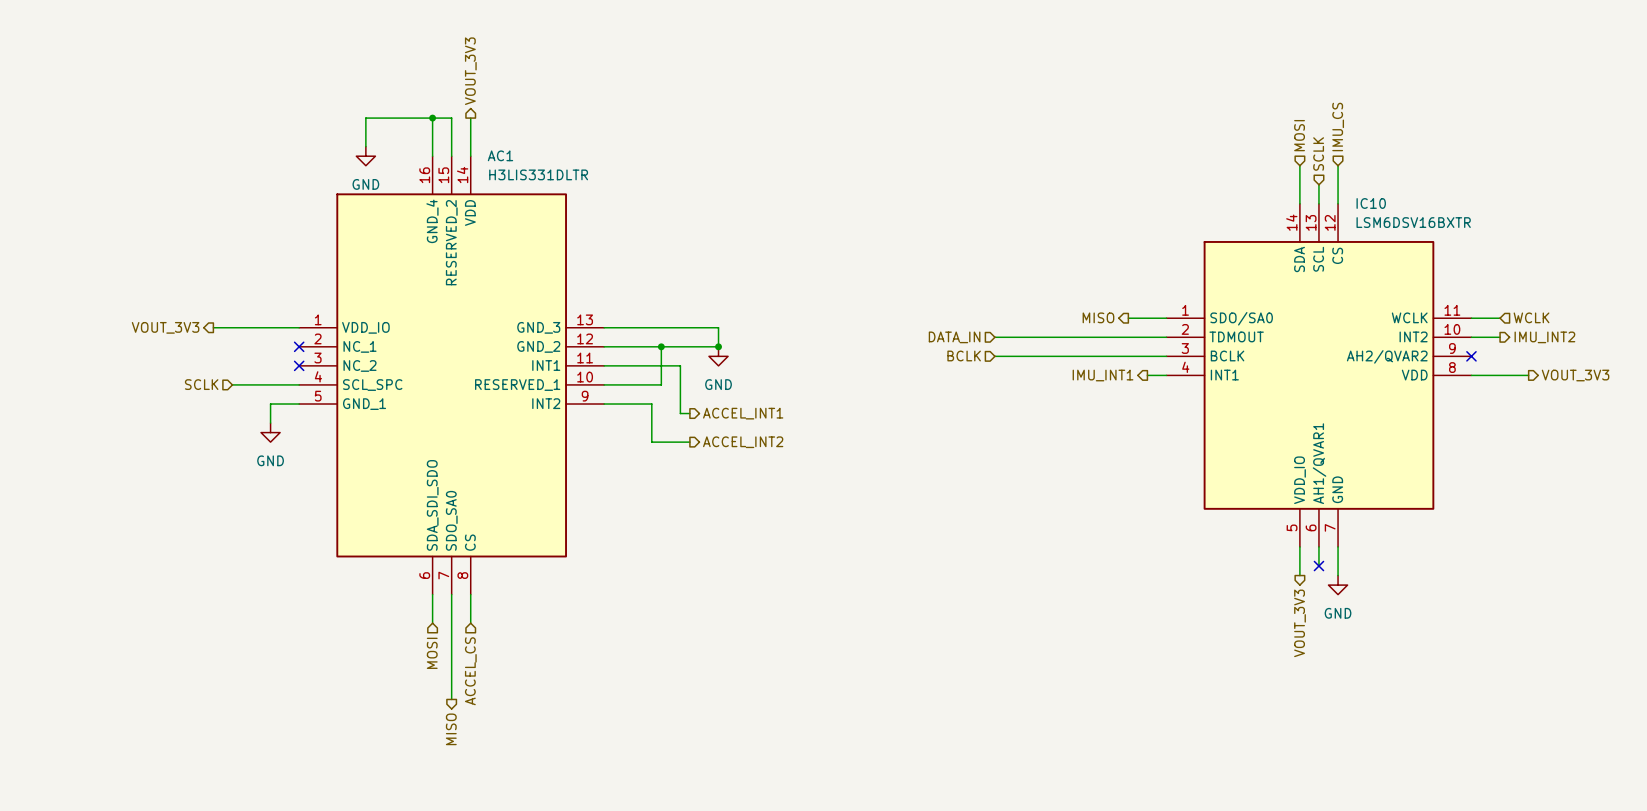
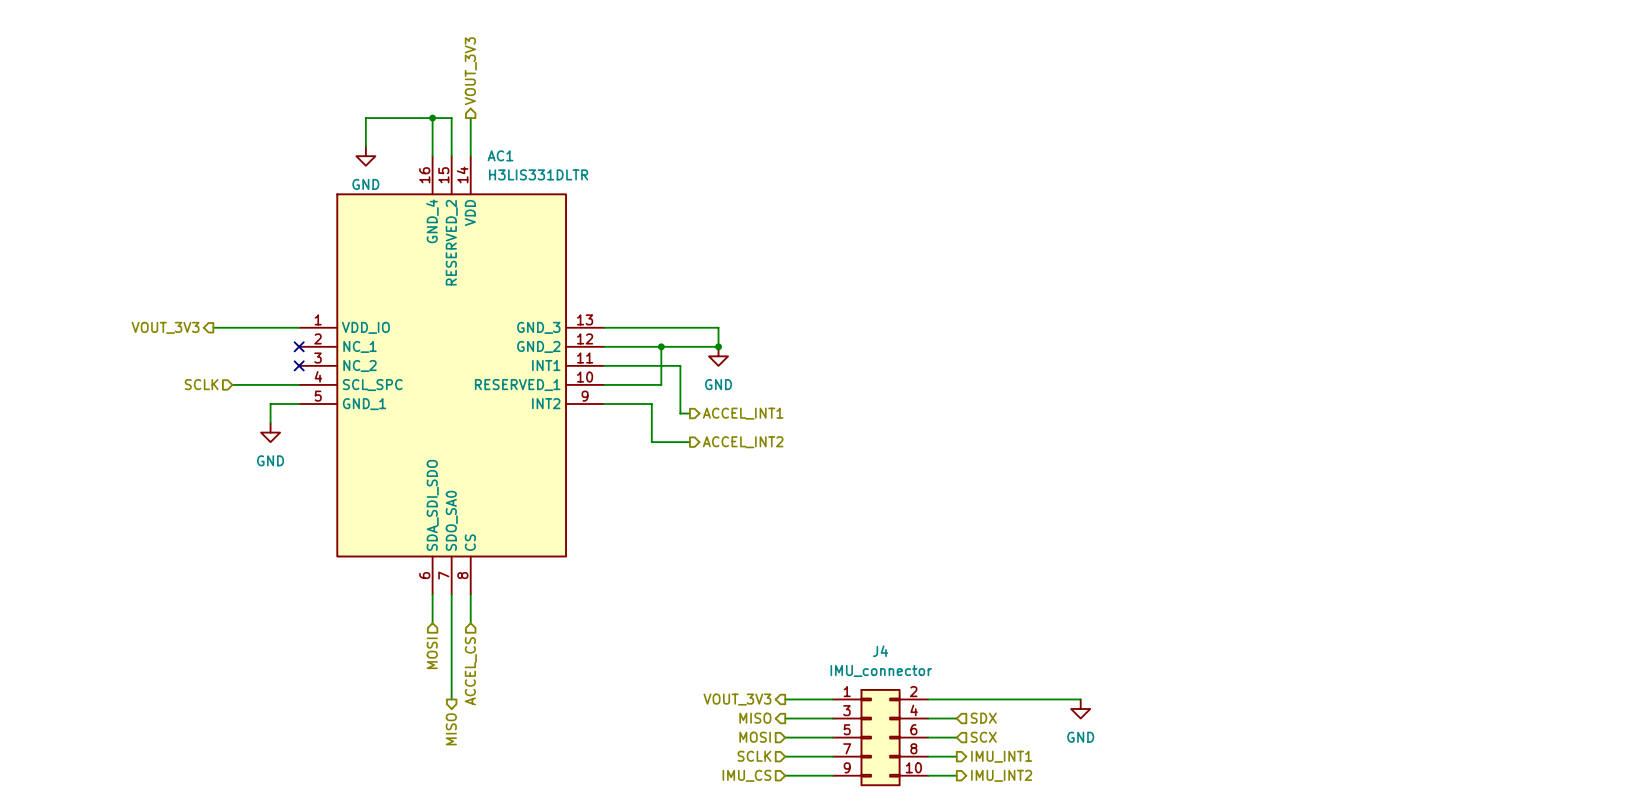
hierarchical label: IMU_CS (1338, 127) -> none
hierarchical label: MOSI (1299, 135) -> none
hierarchical label: SCLK (1318, 154) -> none
wire: (1299, 165) (1299, 203) -> none
wire: (1338, 165) (1338, 203) -> none
wire: (1318, 184) (1318, 203) -> none
hierarchical label: MISO (1098, 317) -> none
hierarchical label: WCLK (1531, 317) -> none
wire: (1128, 318) (1166, 318) -> none
wire: (1471, 318) (1500, 318) -> none
hierarchical label: DATA_IN (954, 337) -> none
wire: (994, 337) (1166, 337) -> none
wire: (1471, 337) (1500, 337) -> none
hierarchical label: IMU_INT2 (1544, 337) -> none
hierarchical label: BCLK (964, 355) -> none
wire: (994, 356) (1166, 356) -> none
no-connect mark: (1471, 356) -> none
hierarchical label: IMU_INT1 (1103, 375) -> none
wire: (1147, 375) (1166, 375) -> none
IC10: LSM6DSV16BXTR (1318, 375) -> none
wire: (1471, 375) (1528, 375) -> none
hierarchical label: VOUT_3V3 (1575, 375) -> none
wire: (1299, 546) (1299, 575) -> none
wire: (1318, 546) (1318, 566) -> none
wire: (1338, 546) (1338, 575) -> none
no-connect mark: (1318, 566) -> none
power symbol: GND (1338, 585) -> none
hierarchical label: VOUT_3V3 (1300, 623) -> none
hierarchical label: none -> VOUT_3V3 (737, 699)
wire: none -> (785, 699) (832, 699)
wire: none -> (928, 699) (1080, 699)
power symbol: none -> GND (1080, 708)
hierarchical label: none -> MISO (755, 718)
wire: none -> (785, 718) (832, 718)
wire: none -> (928, 718) (956, 718)
hierarchical label: none -> SDX (983, 718)
hierarchical label: none -> MOSI (755, 737)
wire: none -> (785, 737) (832, 737)
J4: none -> IMU_connector (880, 737)
wire: none -> (928, 737) (956, 737)
hierarchical label: none -> SCX (983, 737)
hierarchical label: none -> SCLK (754, 756)
wire: none -> (785, 756) (832, 756)
wire: none -> (928, 756) (956, 756)
hierarchical label: none -> IMU_INT1 (1001, 756)
hierarchical label: none -> IMU_CS (746, 775)
wire: none -> (785, 775) (832, 775)
wire: none -> (928, 775) (956, 775)
hierarchical label: none -> IMU_INT2 (1001, 775)

